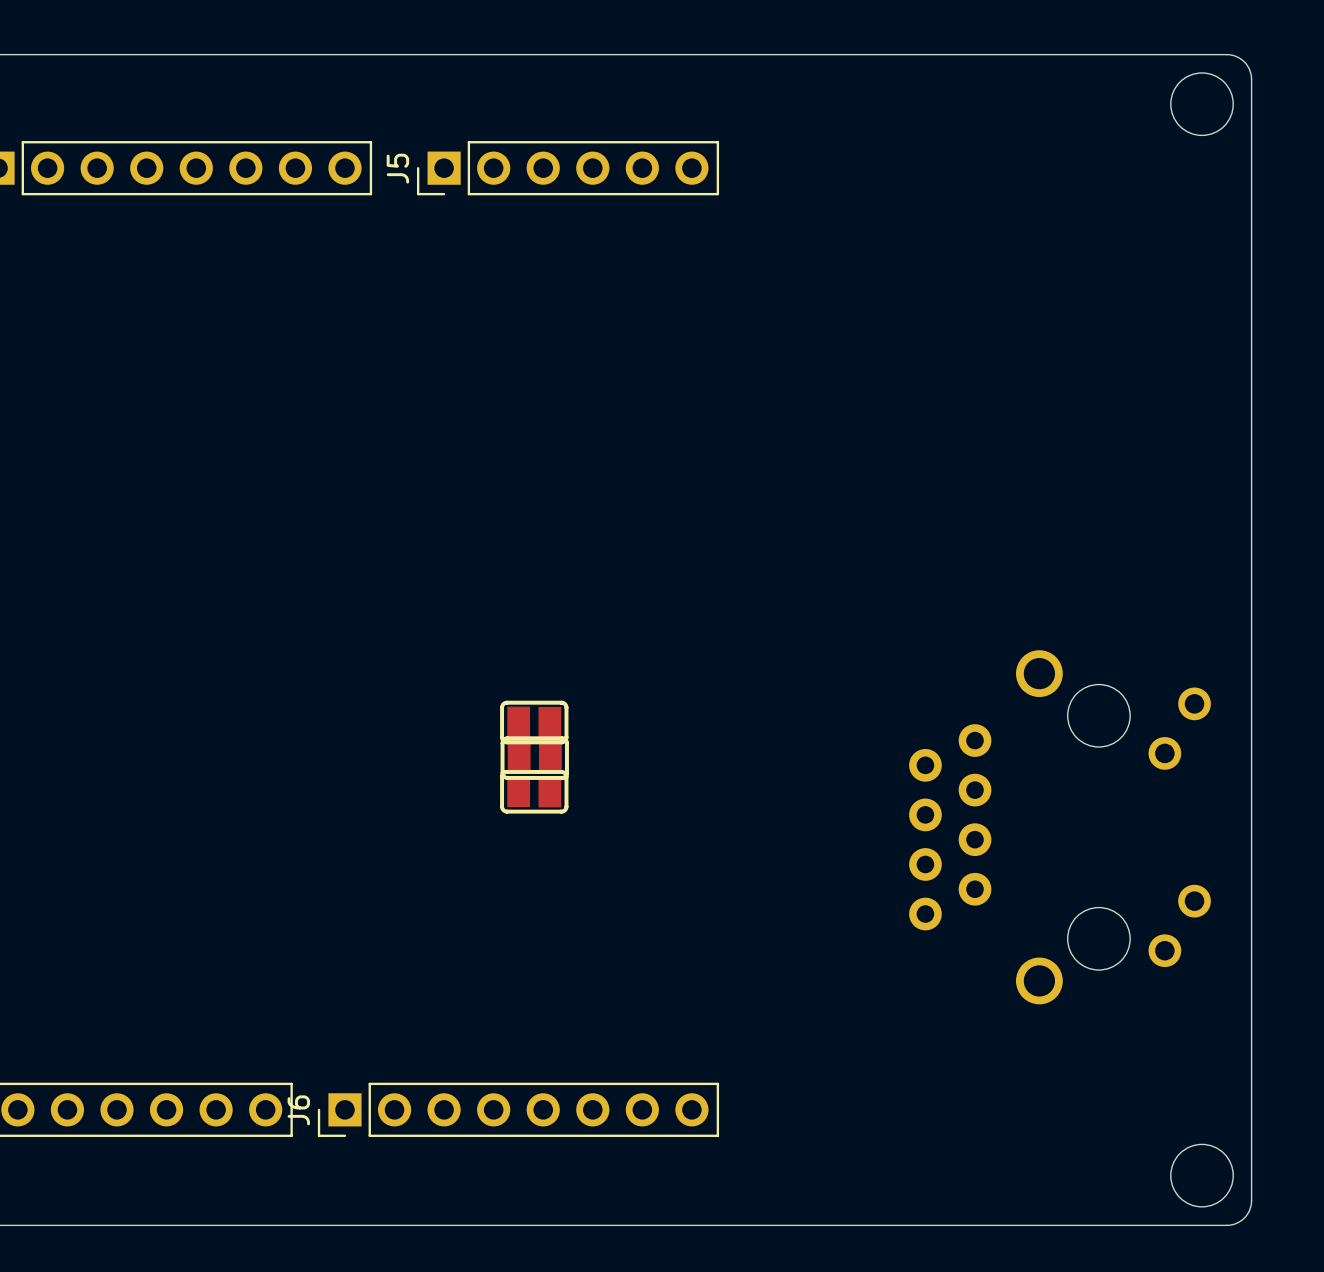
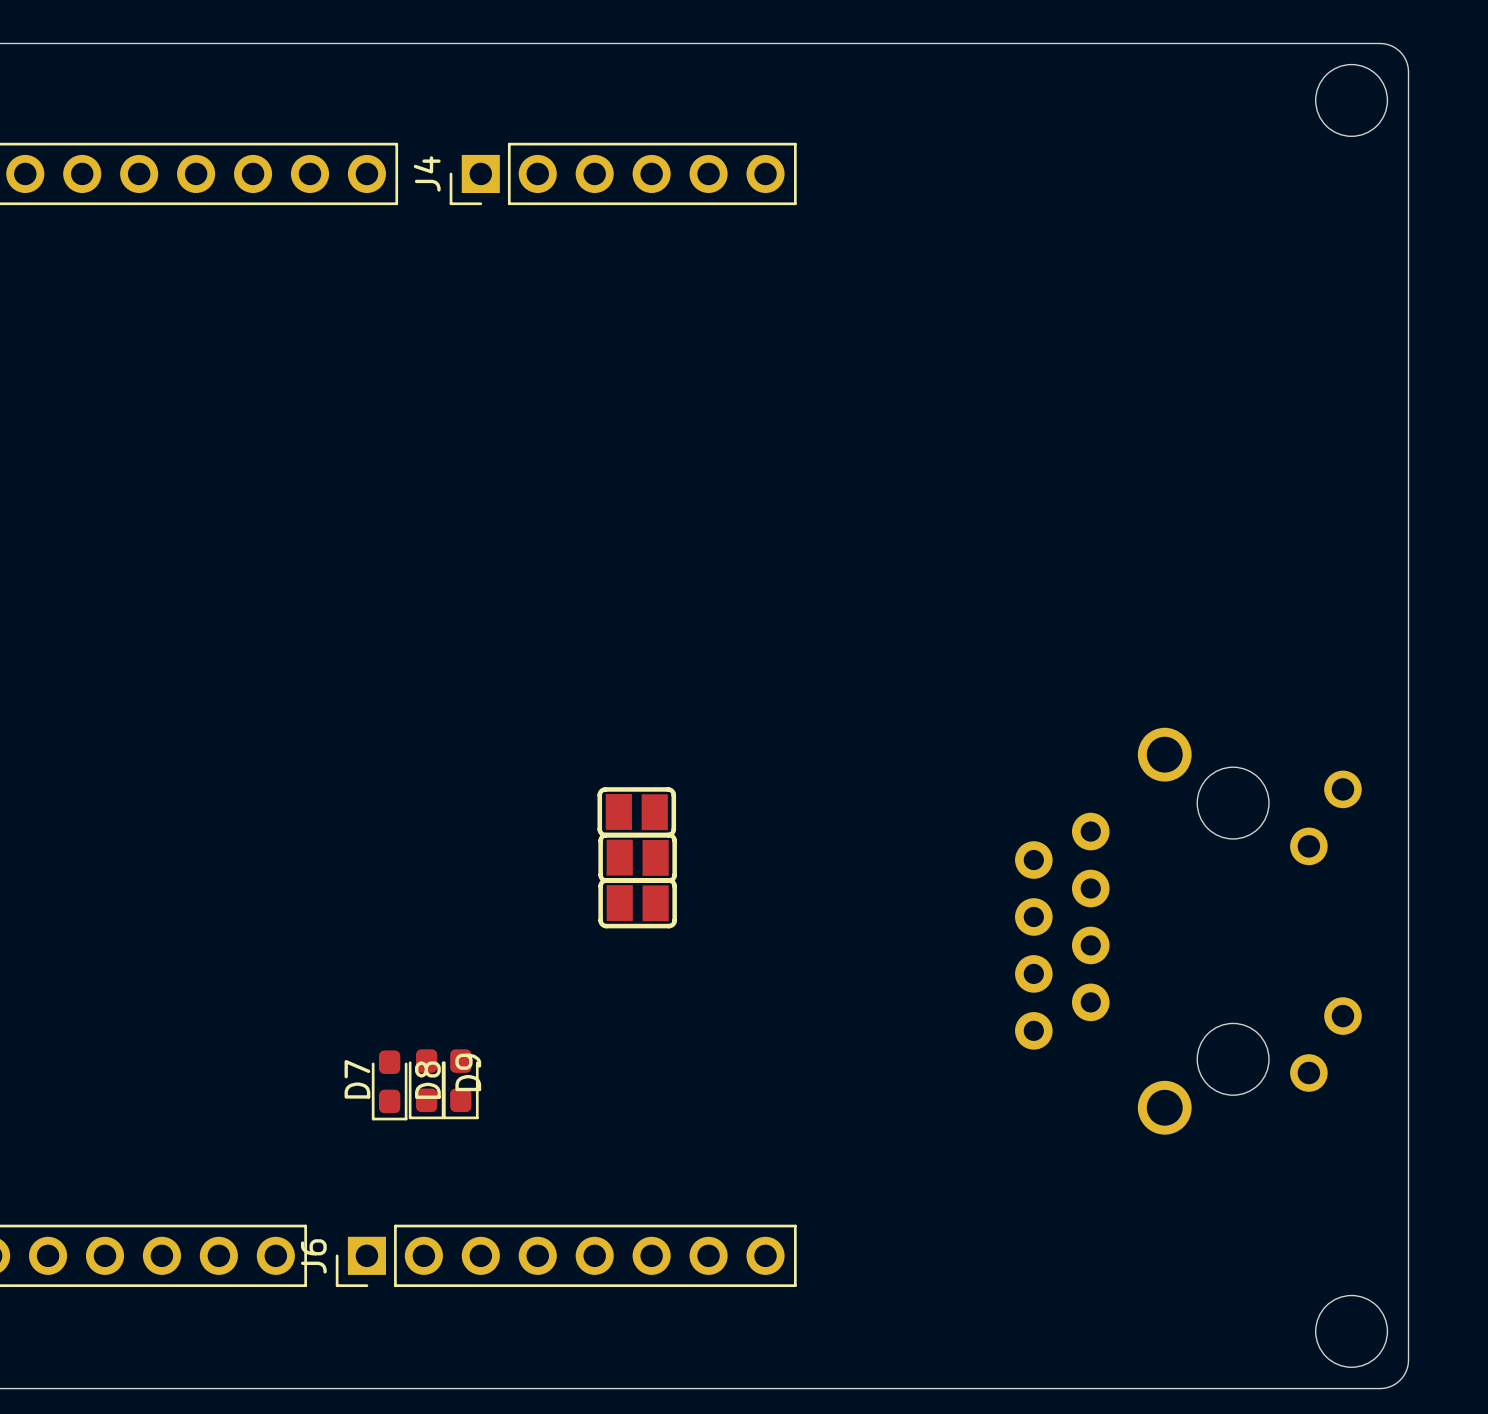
J5 name: J5 (397, 168) -> J4 (427, 173)
part: (534, 722) -> none
part: none -> (636, 812)
part: (534, 758) -> none
part: none -> (637, 857)
part: (534, 791) -> none
part: none -> (637, 903)
D9: none -> (426, 1084)
D8: none -> (460, 1084)
D7: none -> (389, 1085)

